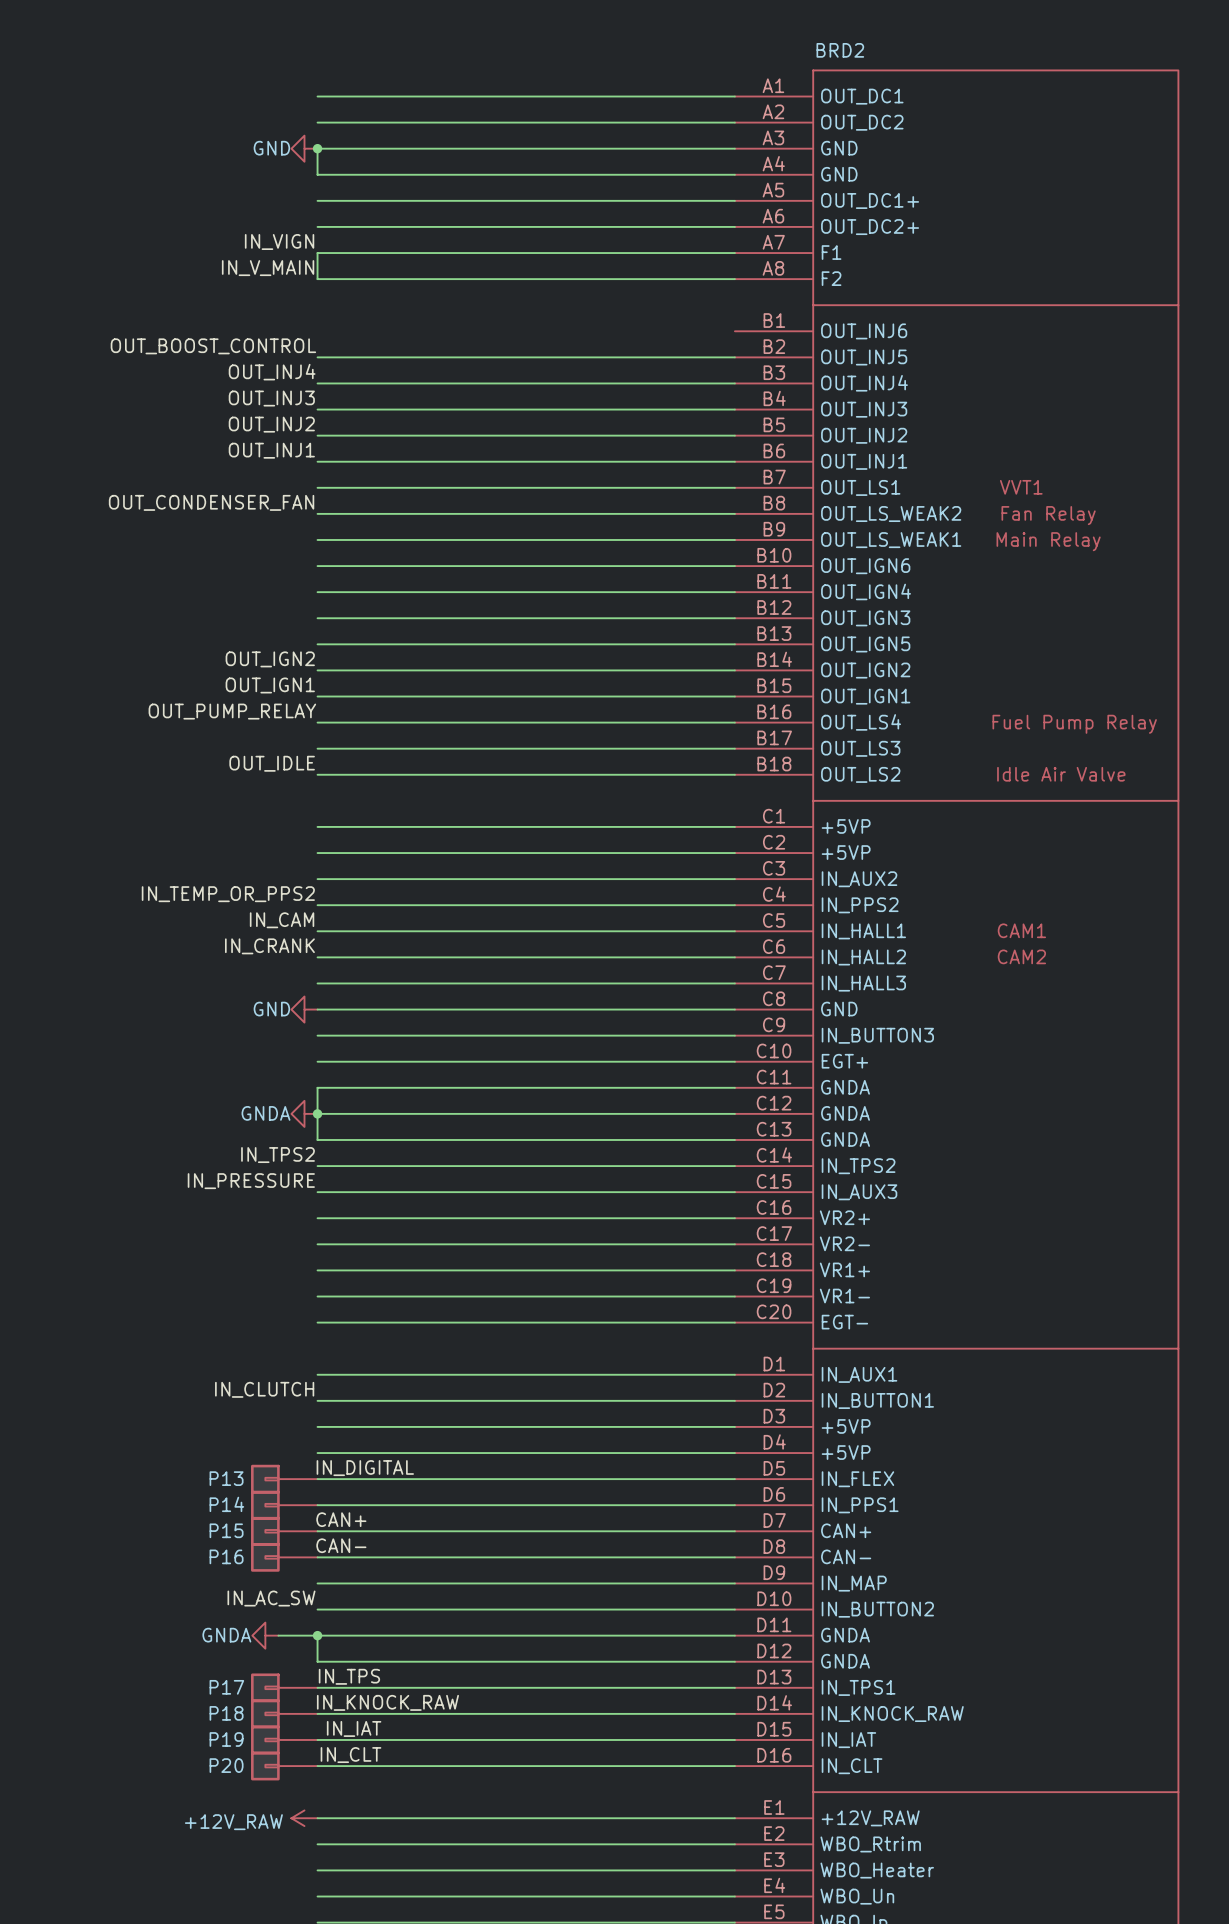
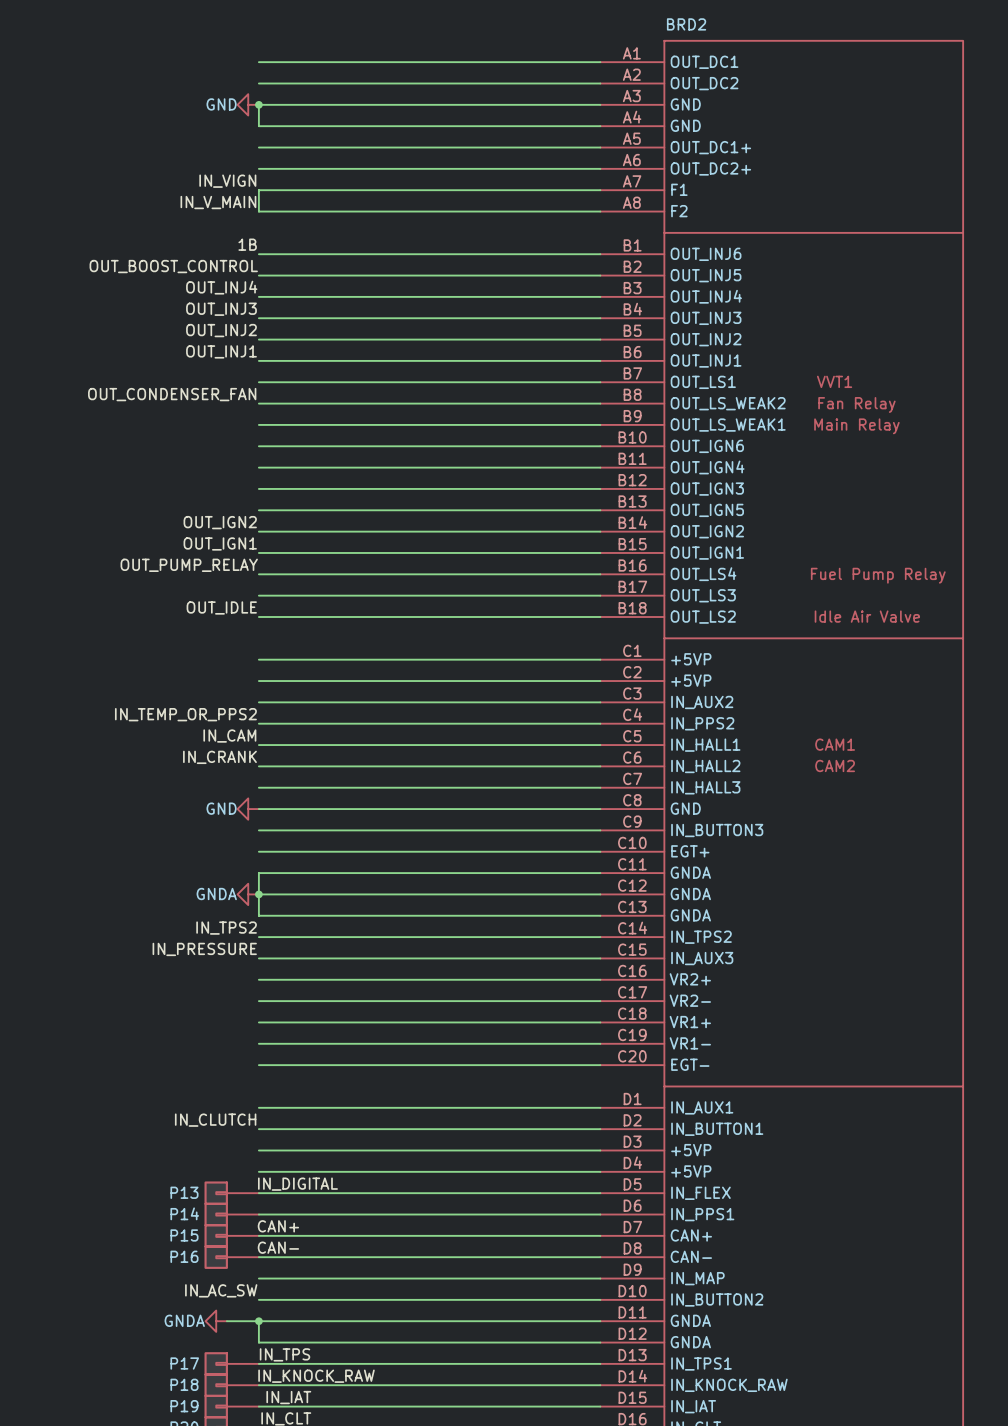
label: none -> 1B (247, 244)
wire: none -> (258, 254) (600, 254)

